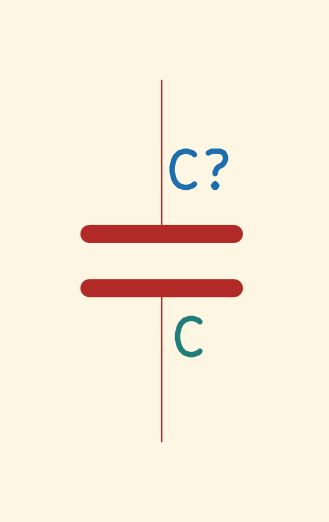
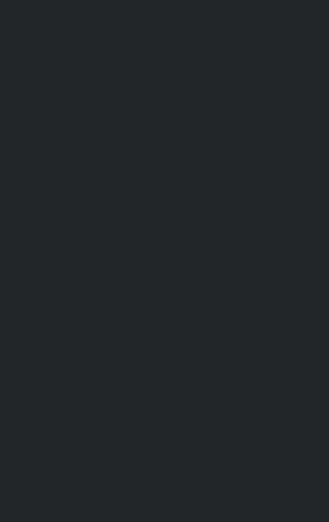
C?: C (161, 261) -> none

